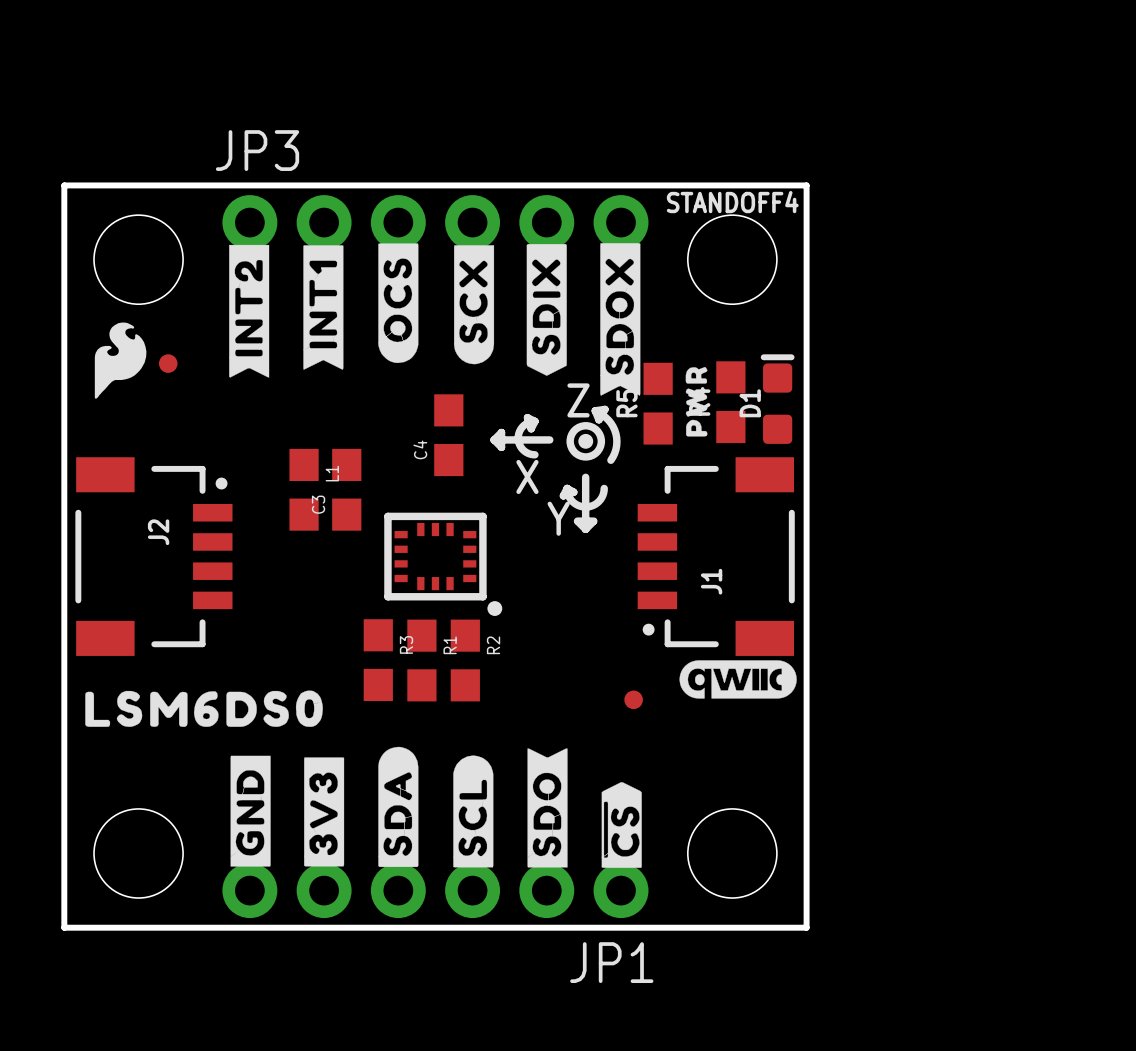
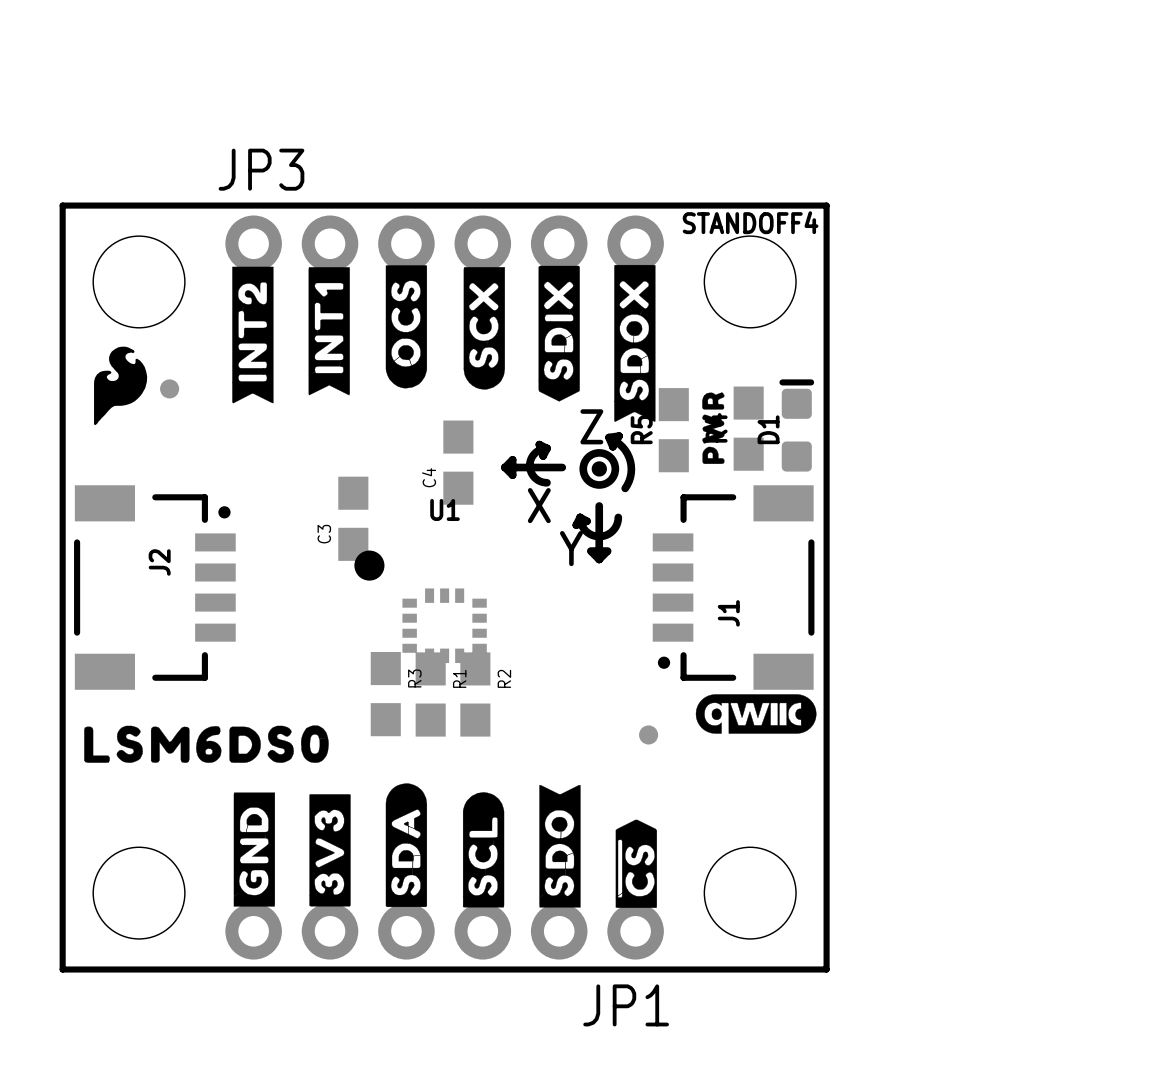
L1: (304, 489) -> none
part: (443, 564) -> none
U1: none -> (420, 606)

